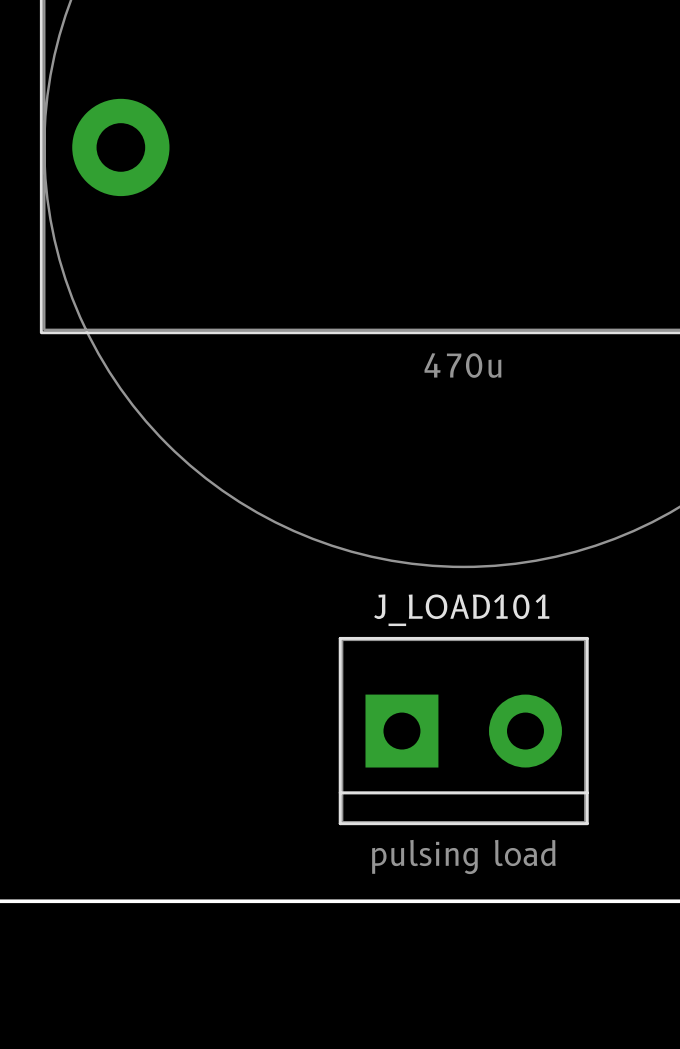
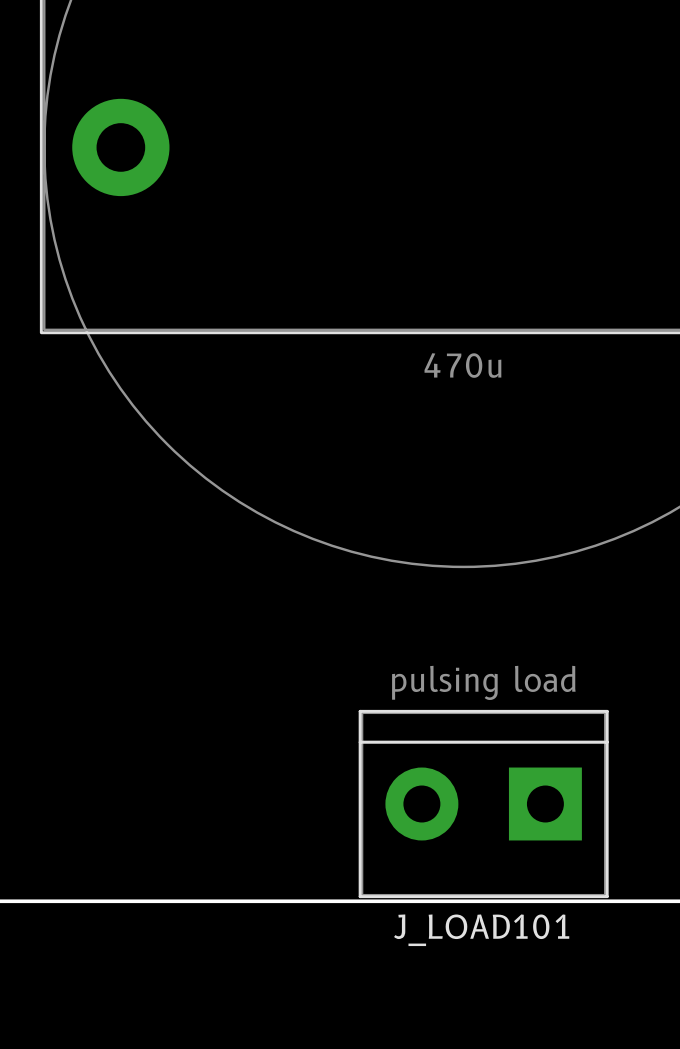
J_LOAD101 rotation: 0° (463, 731) -> 180° (483, 804)

